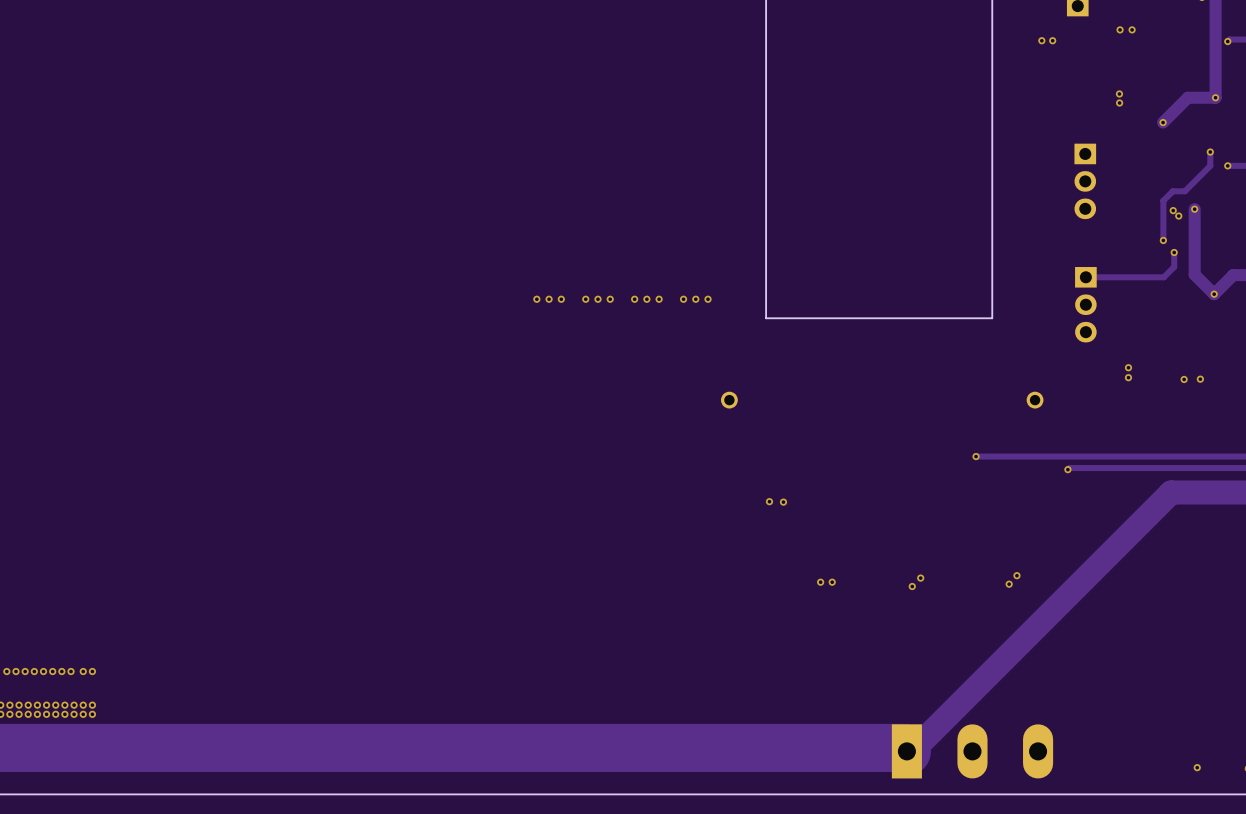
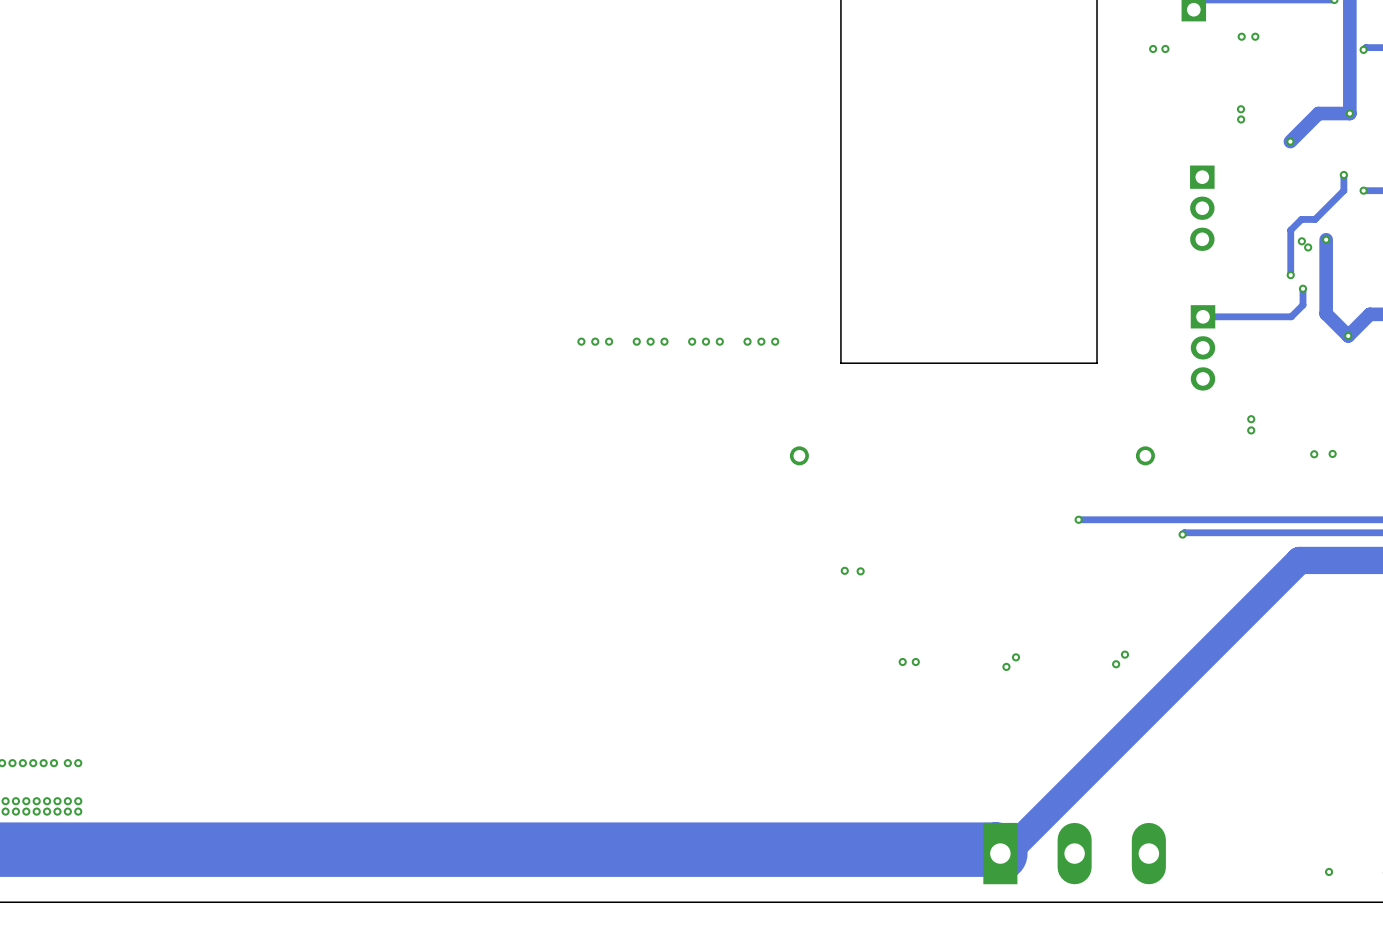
via: (1184, 379) -> none
via: (1200, 379) -> none
via: none -> (1314, 454)
via: none -> (1332, 453)

